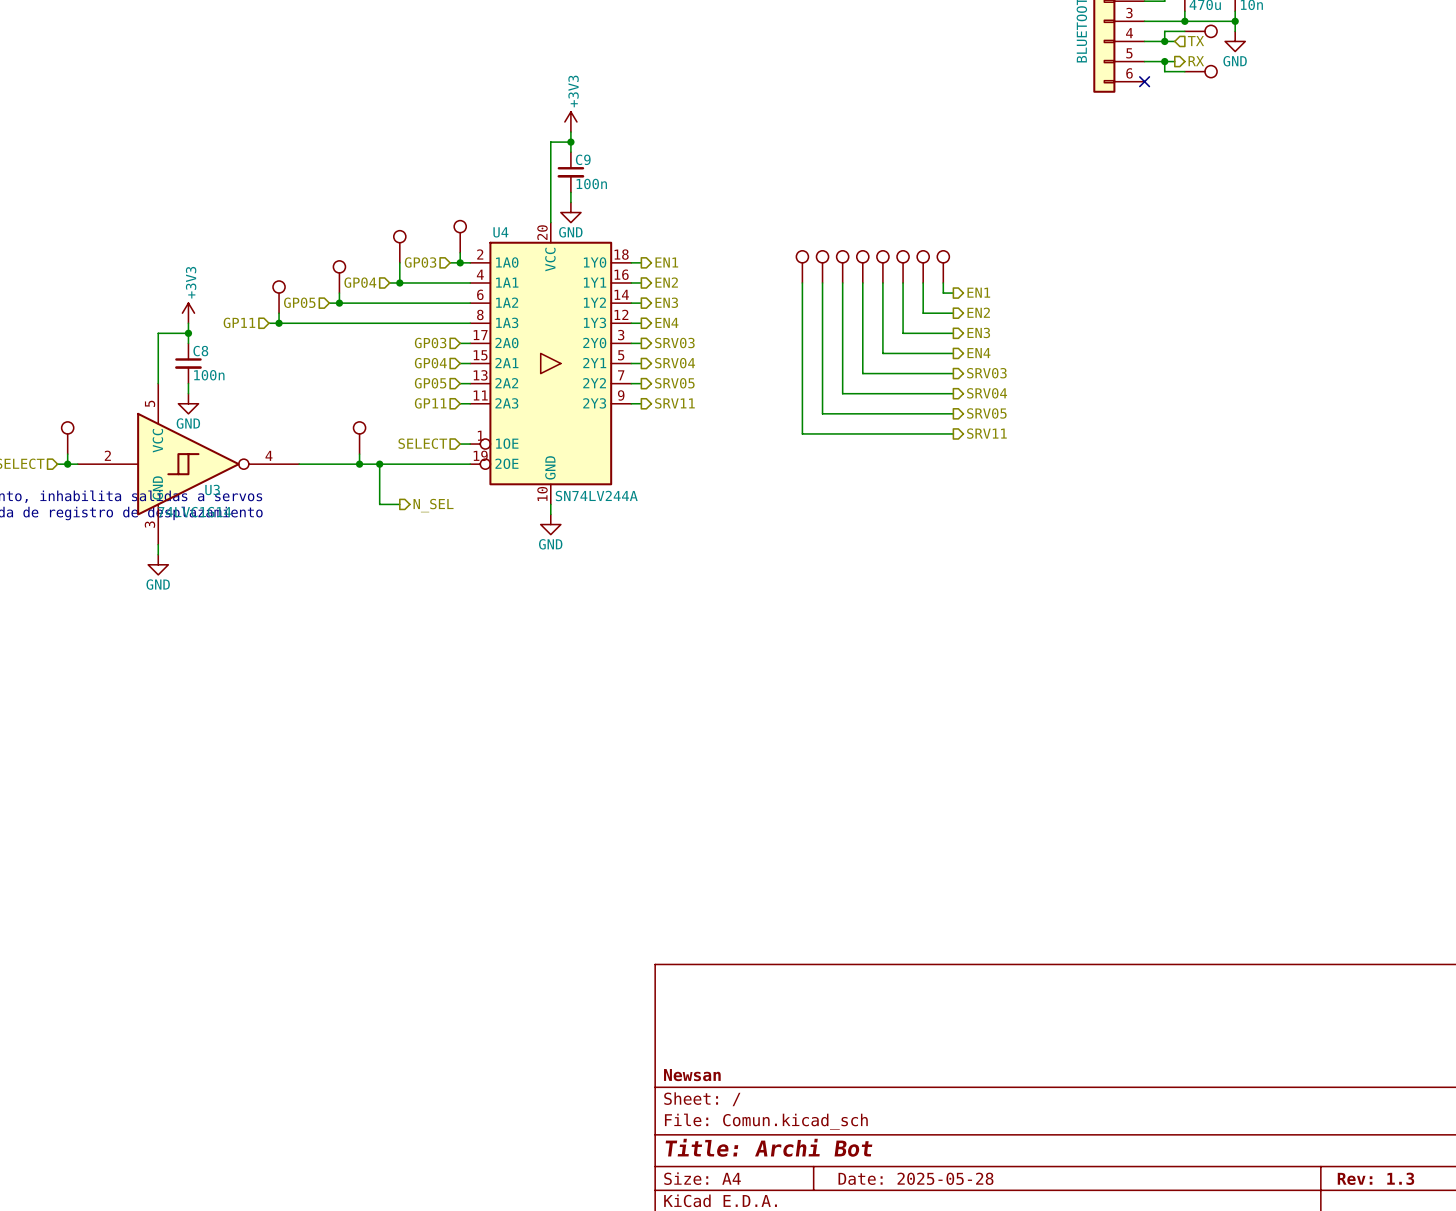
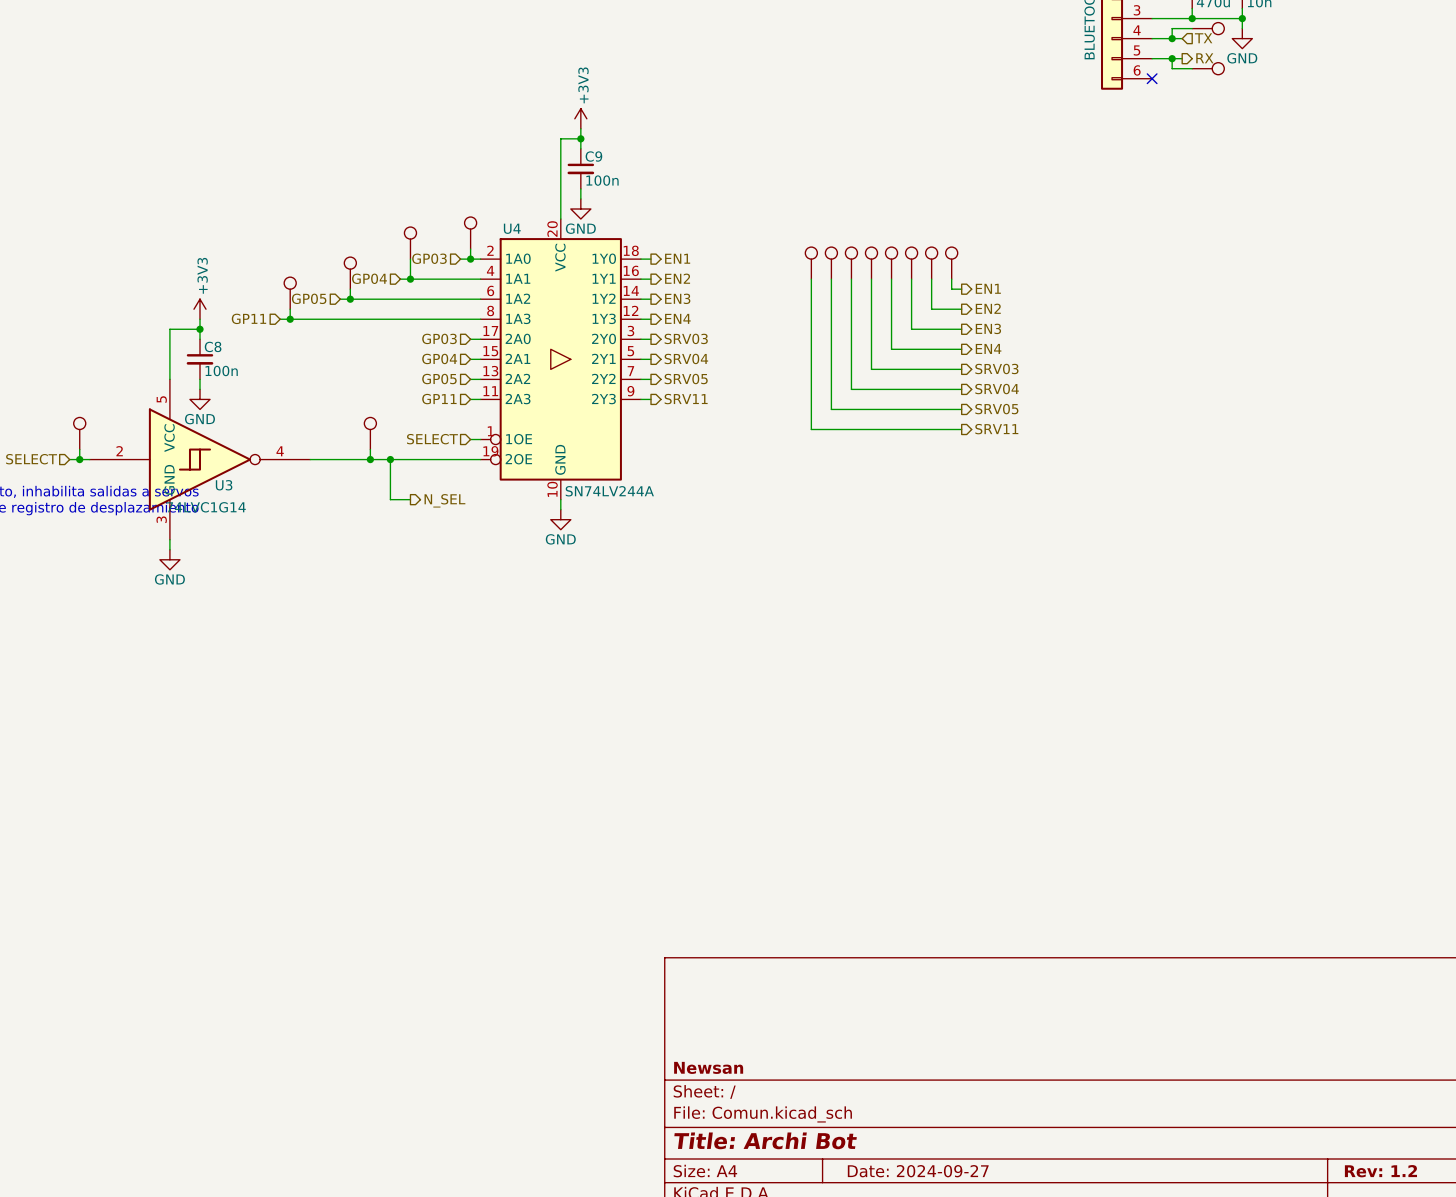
title block: Date: 2025-05-28 (915, 1178) -> Date: 2024-09-27 (918, 1171)
title block: Rev: 1.3 (1375, 1178) -> Rev: 1.2 (1380, 1171)

